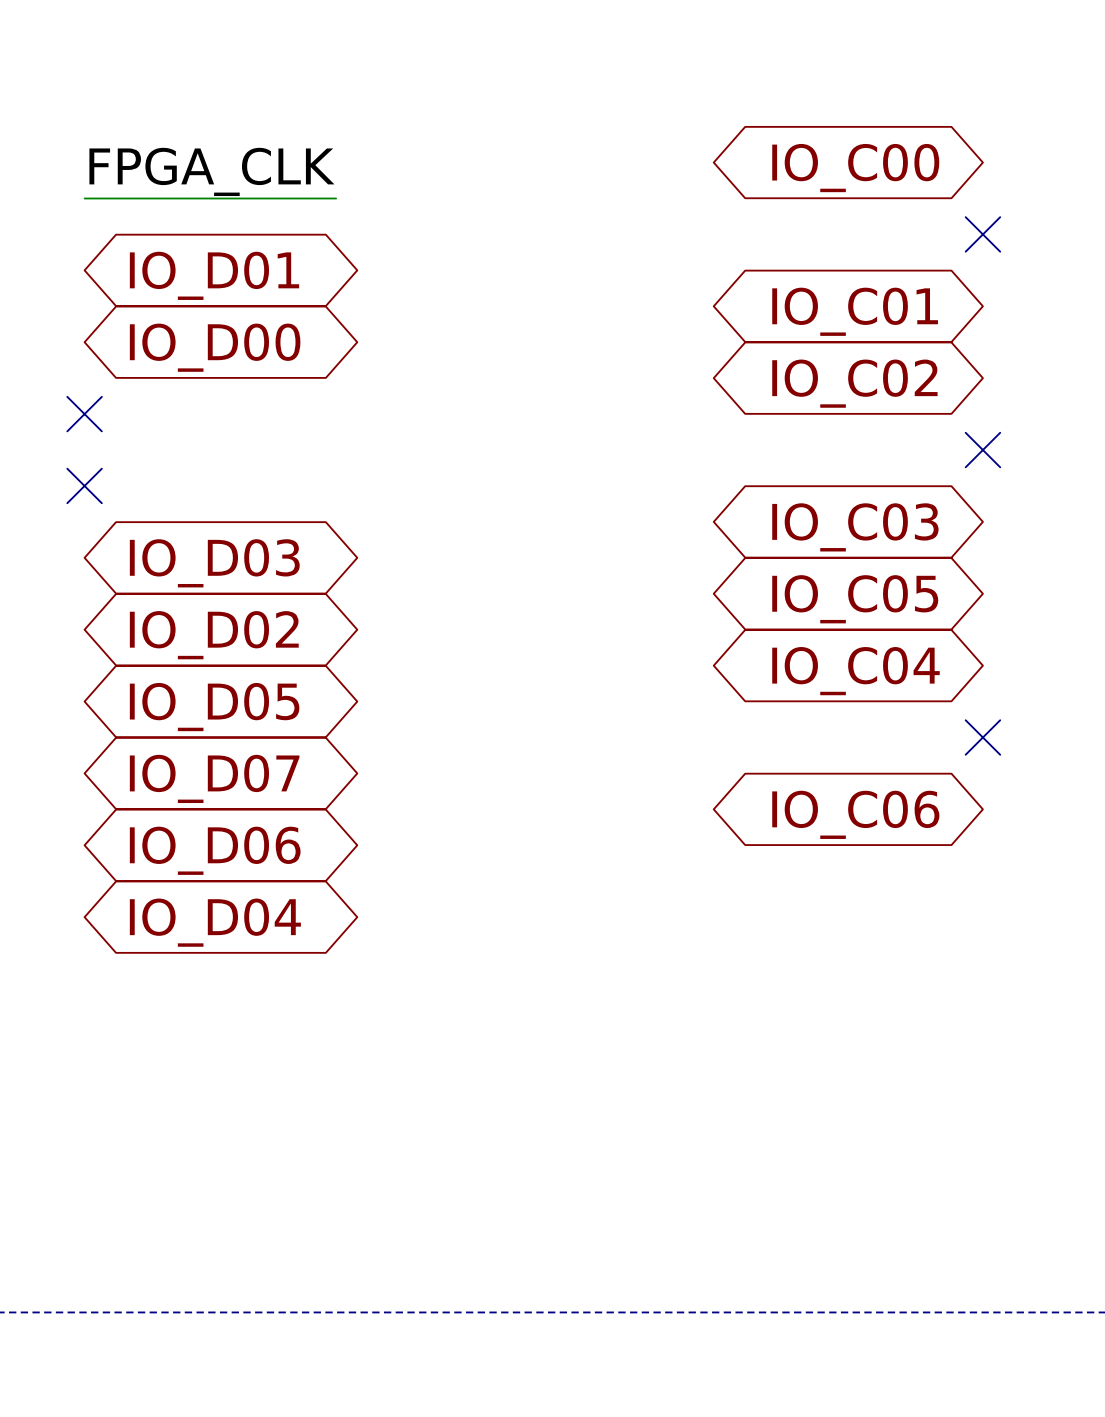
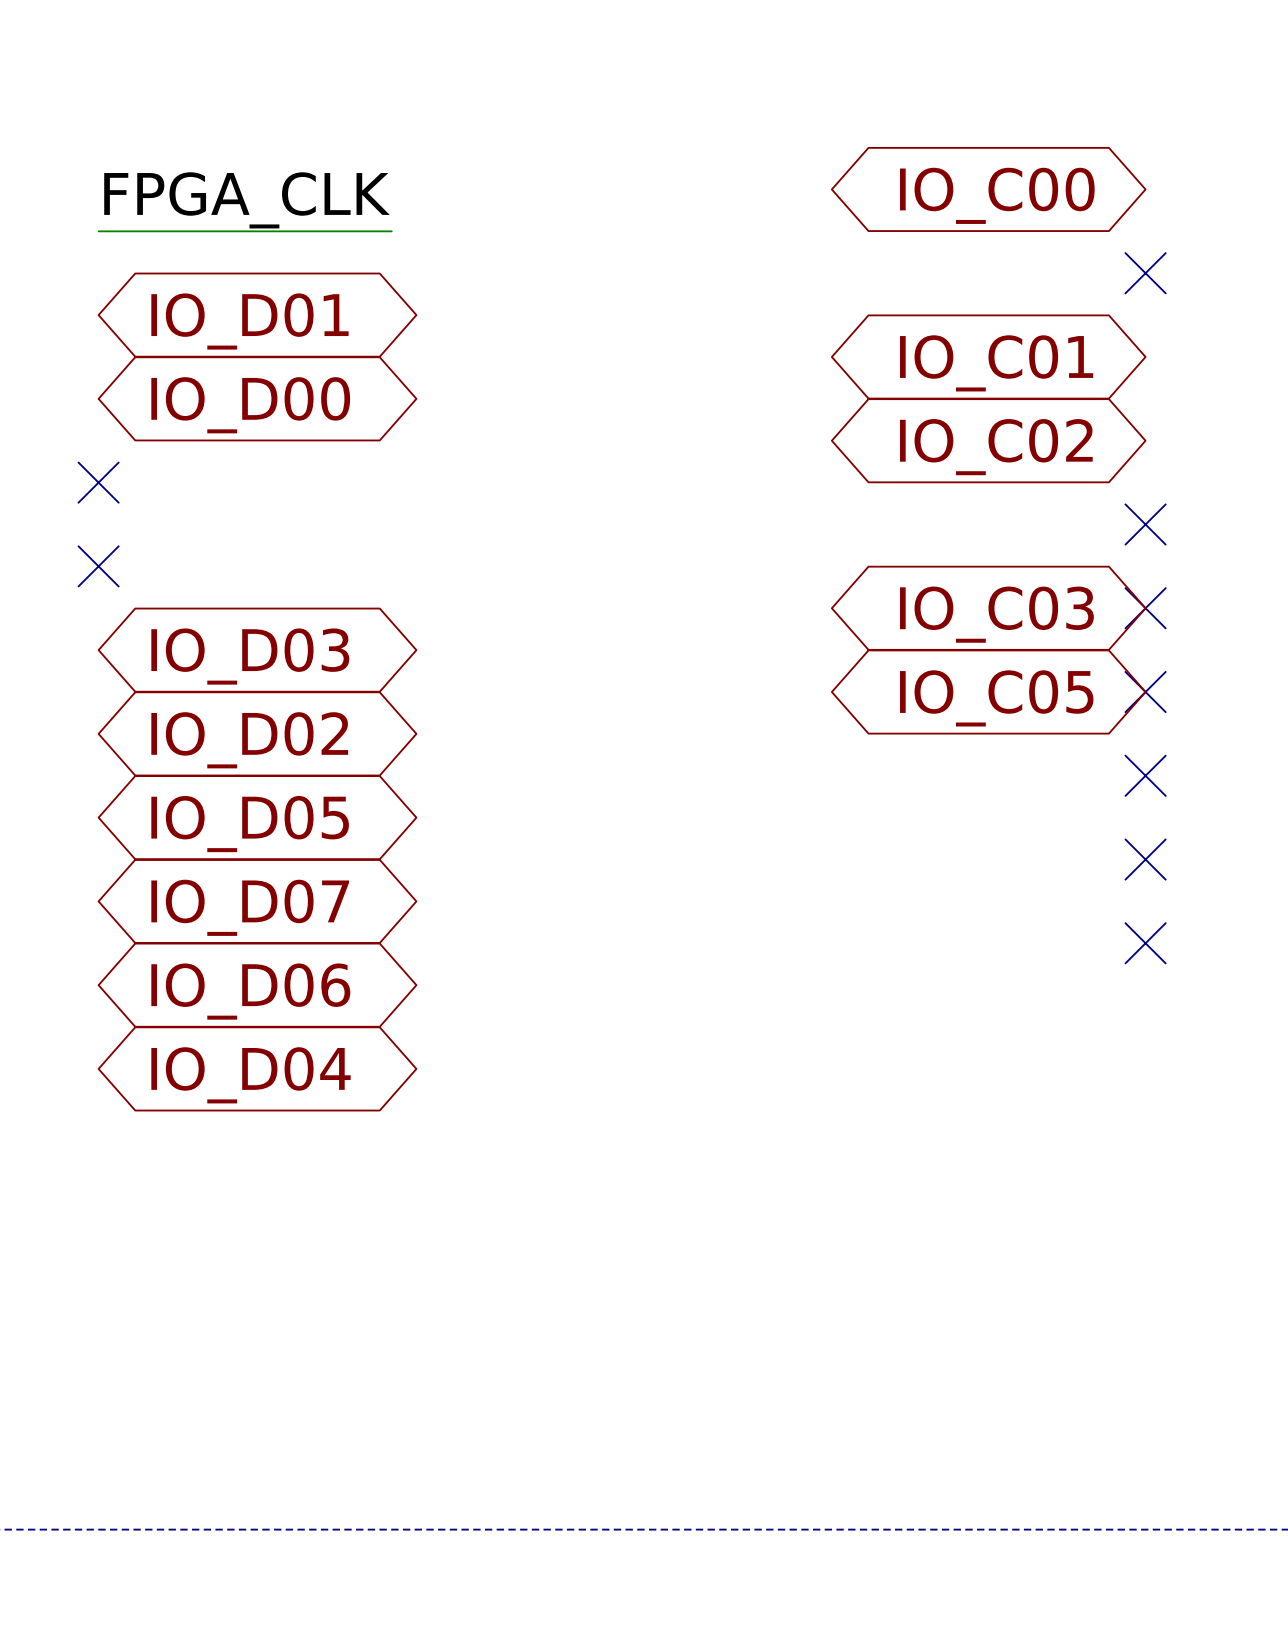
no-connect mark: none -> (1145, 608)
no-connect mark: none -> (1145, 692)
no-connect mark: none -> (1145, 775)
global label: IO_C04 (855, 671) -> none
no-connect mark: none -> (1145, 943)
global label: IO_C06 (855, 814) -> none

